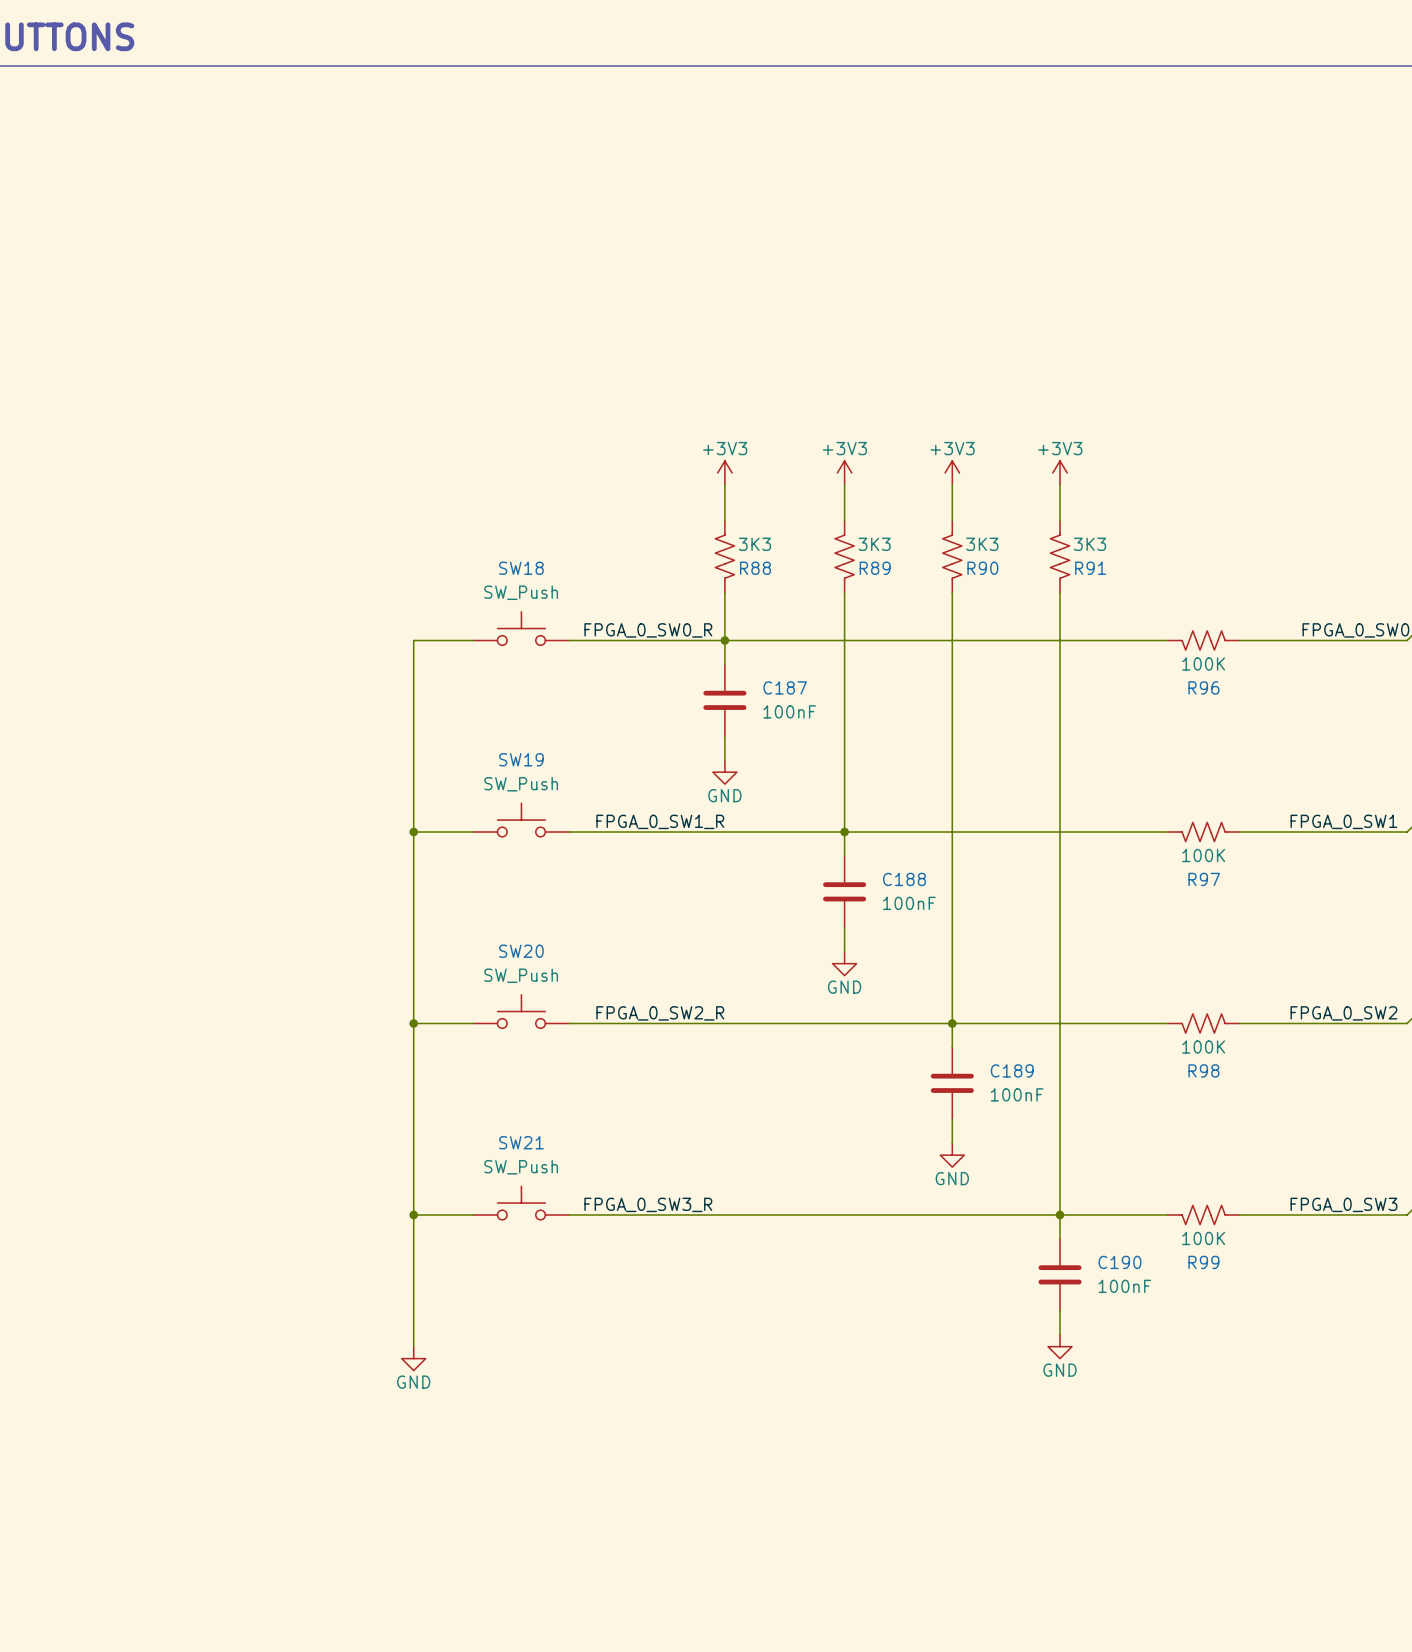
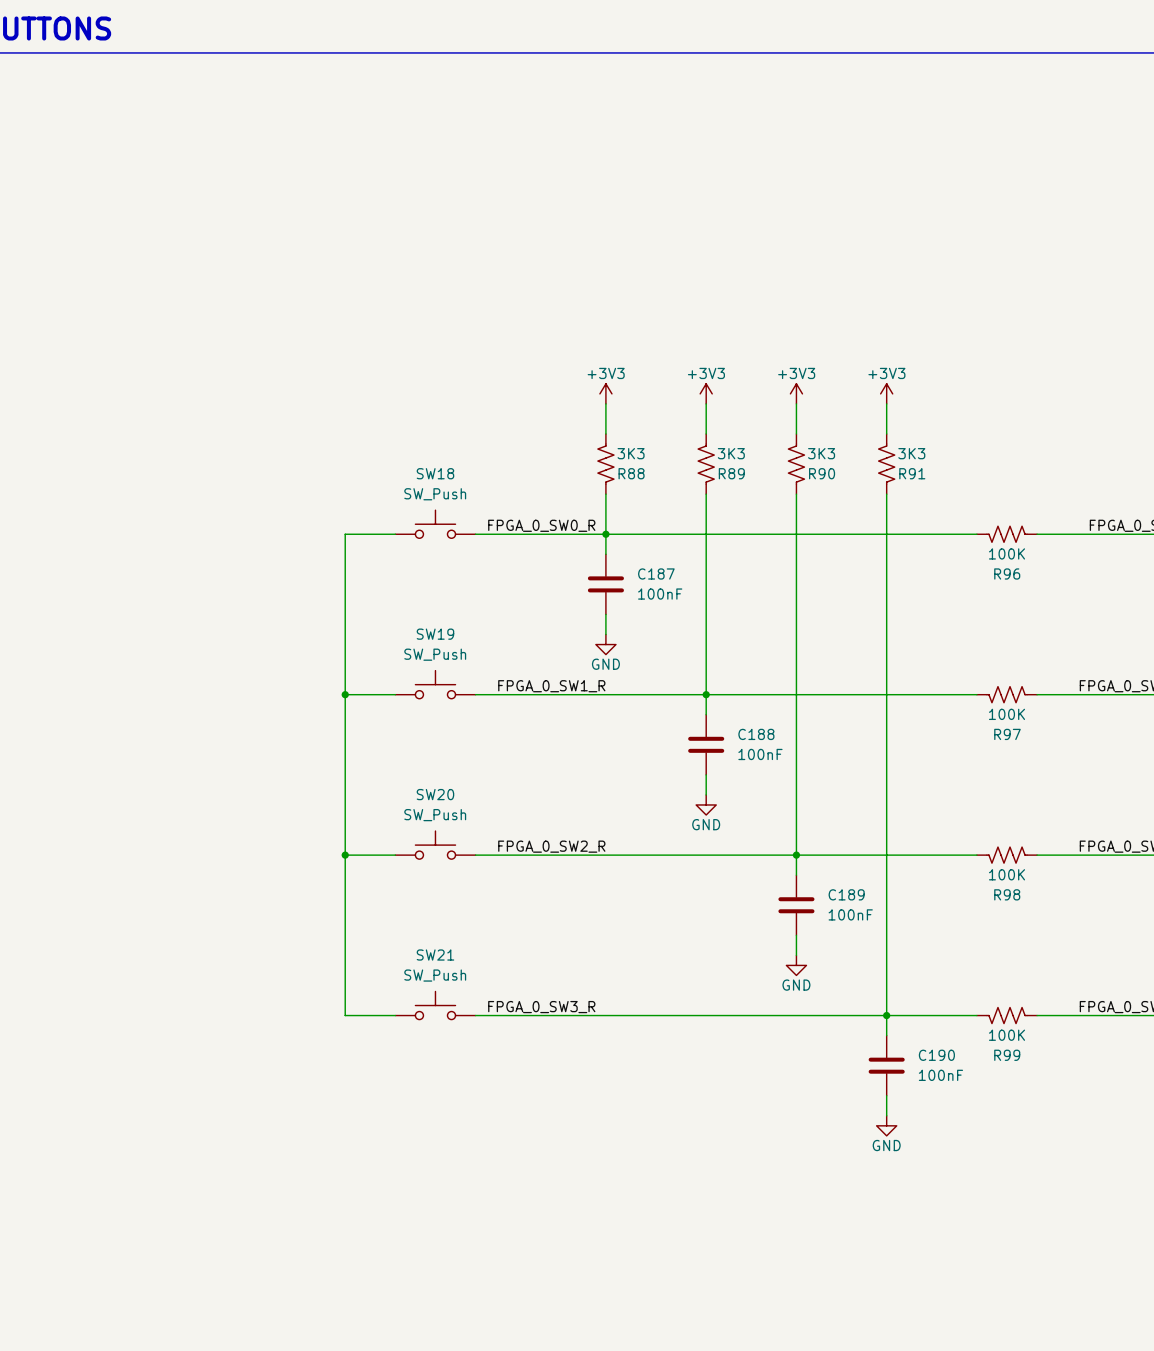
wire: (413, 1215) (413, 1346) -> none
junction: (413, 1215) -> none
power symbol: GND (413, 1358) -> none

